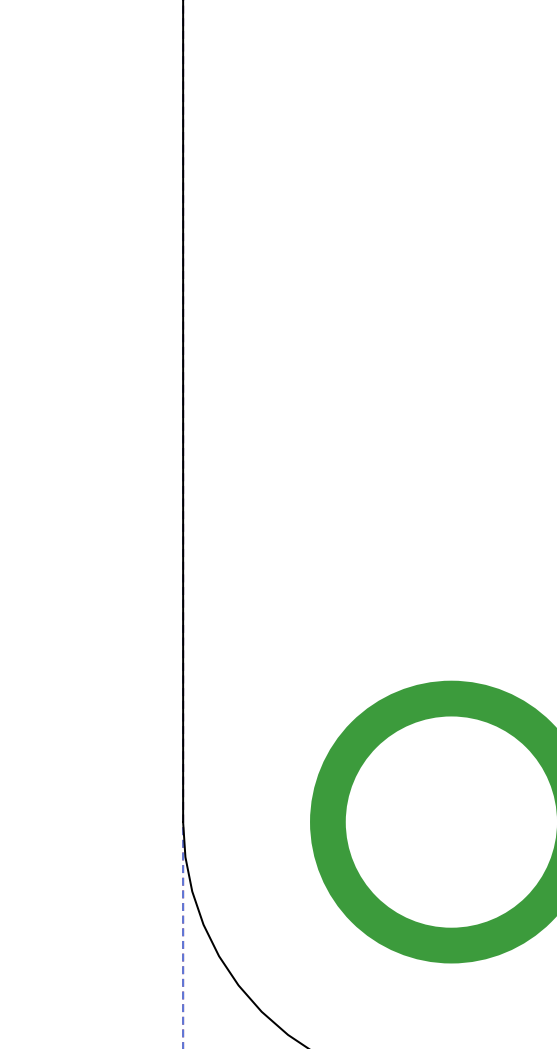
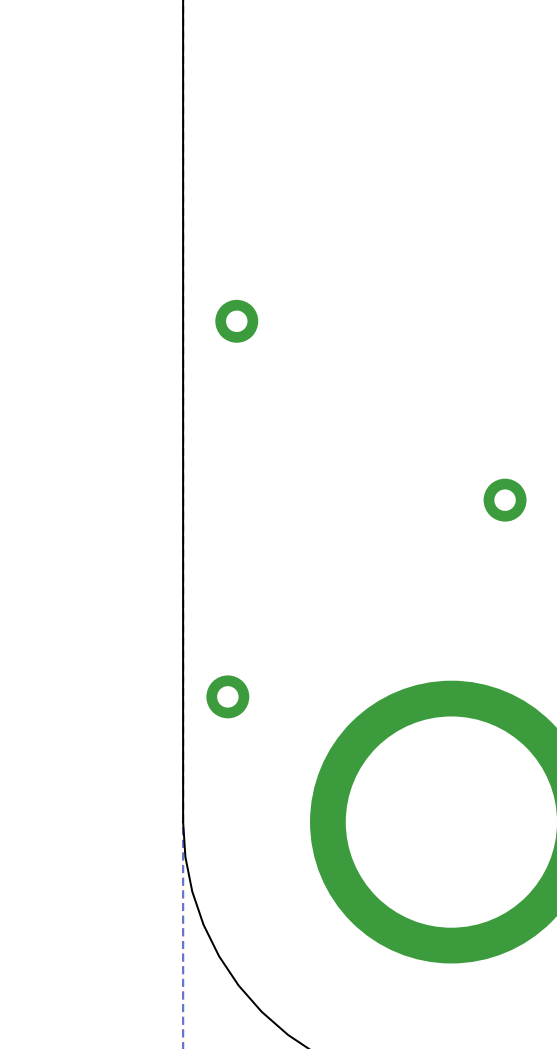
via: none -> (236, 321)
via: none -> (505, 500)
via: none -> (227, 696)

